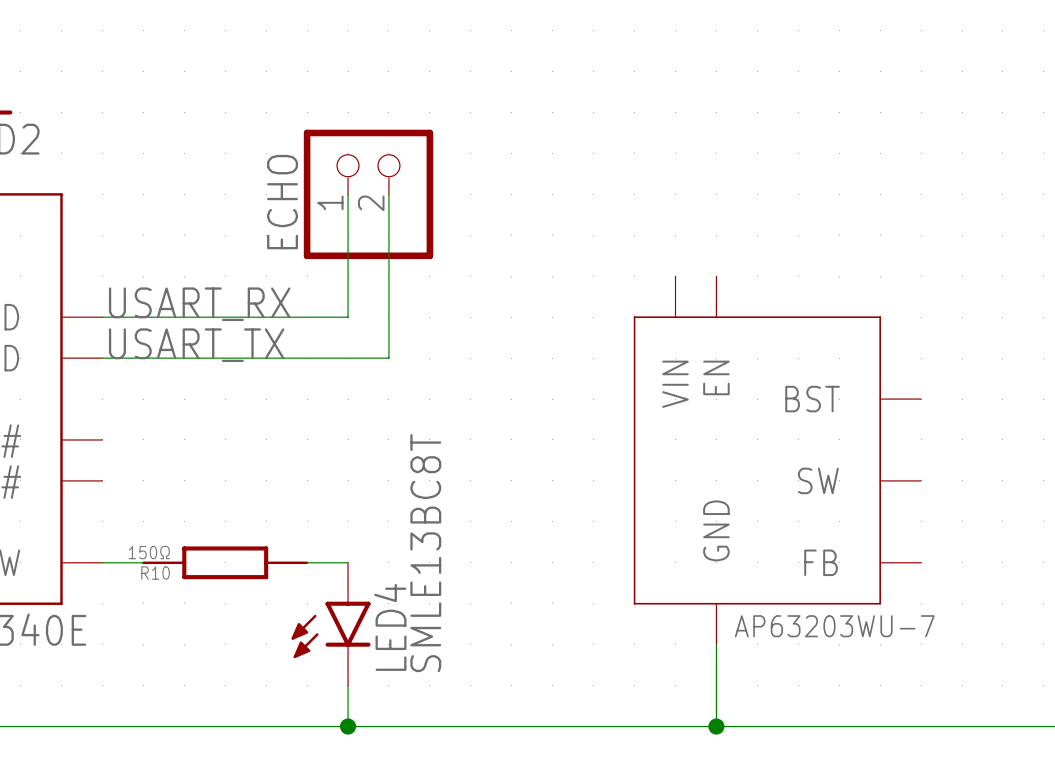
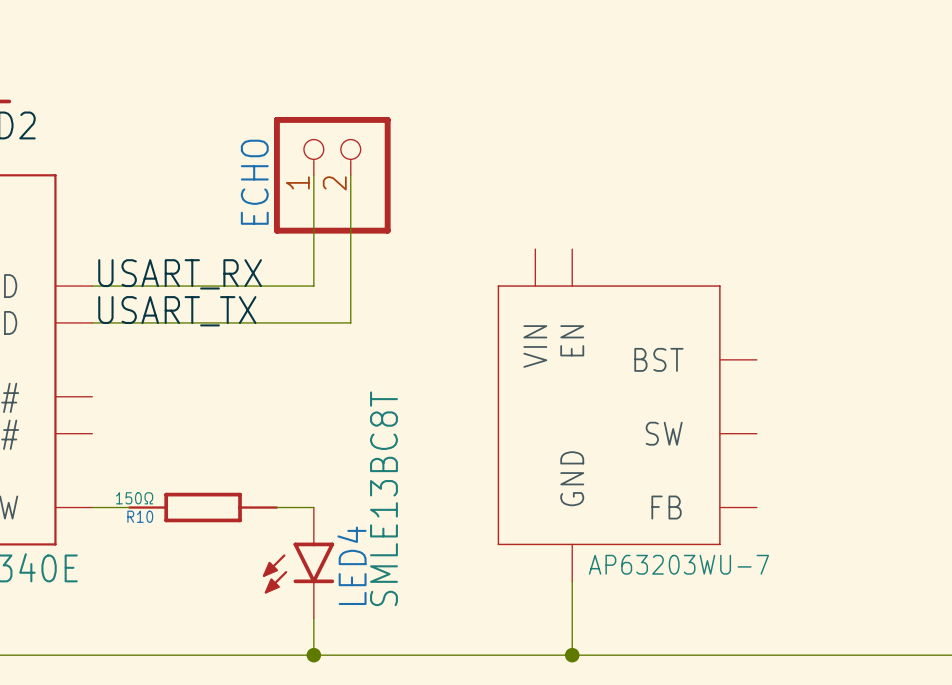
part position: (777, 460) -> (627, 415)
wire: (716, 644) (716, 726) -> (572, 581) (572, 655)
junction position: (716, 726) -> (572, 655)

